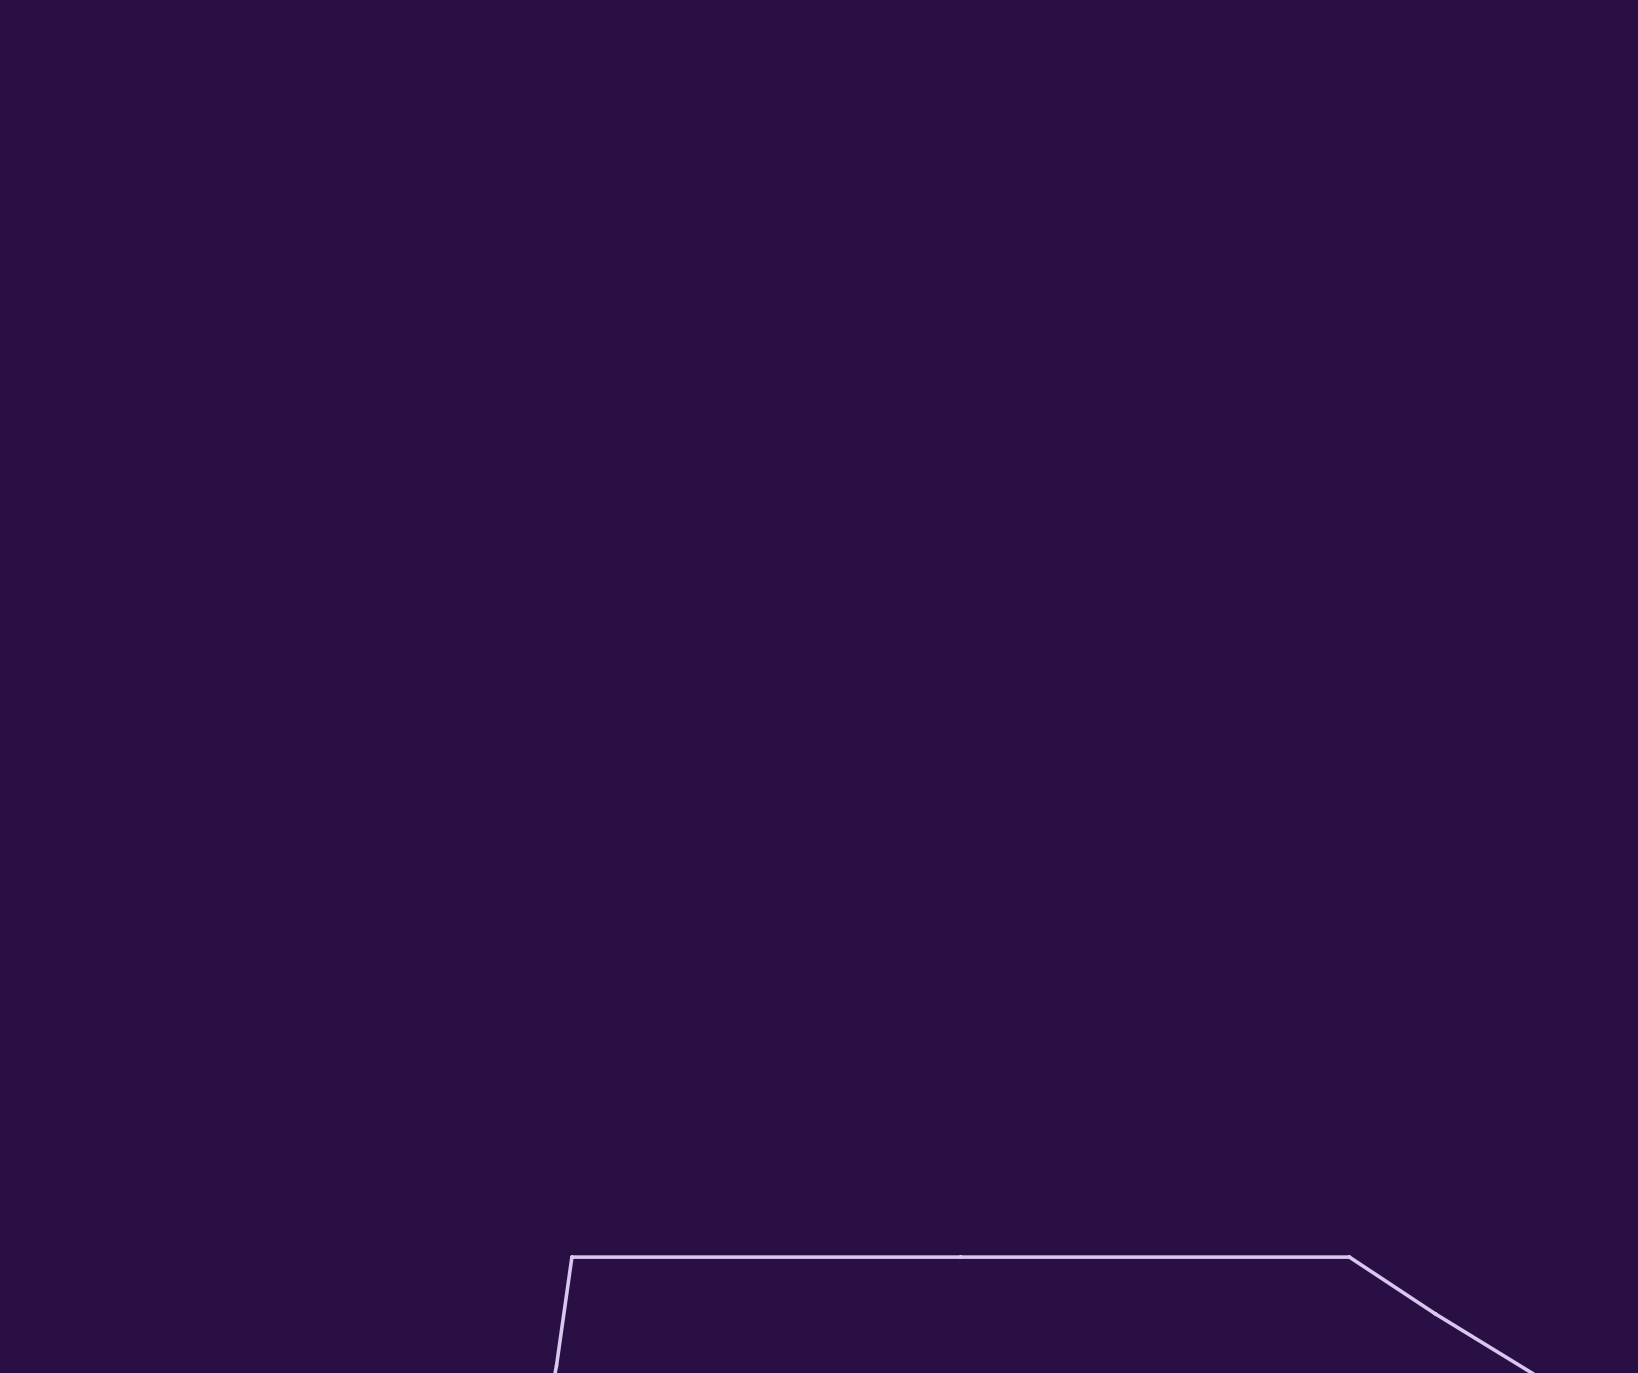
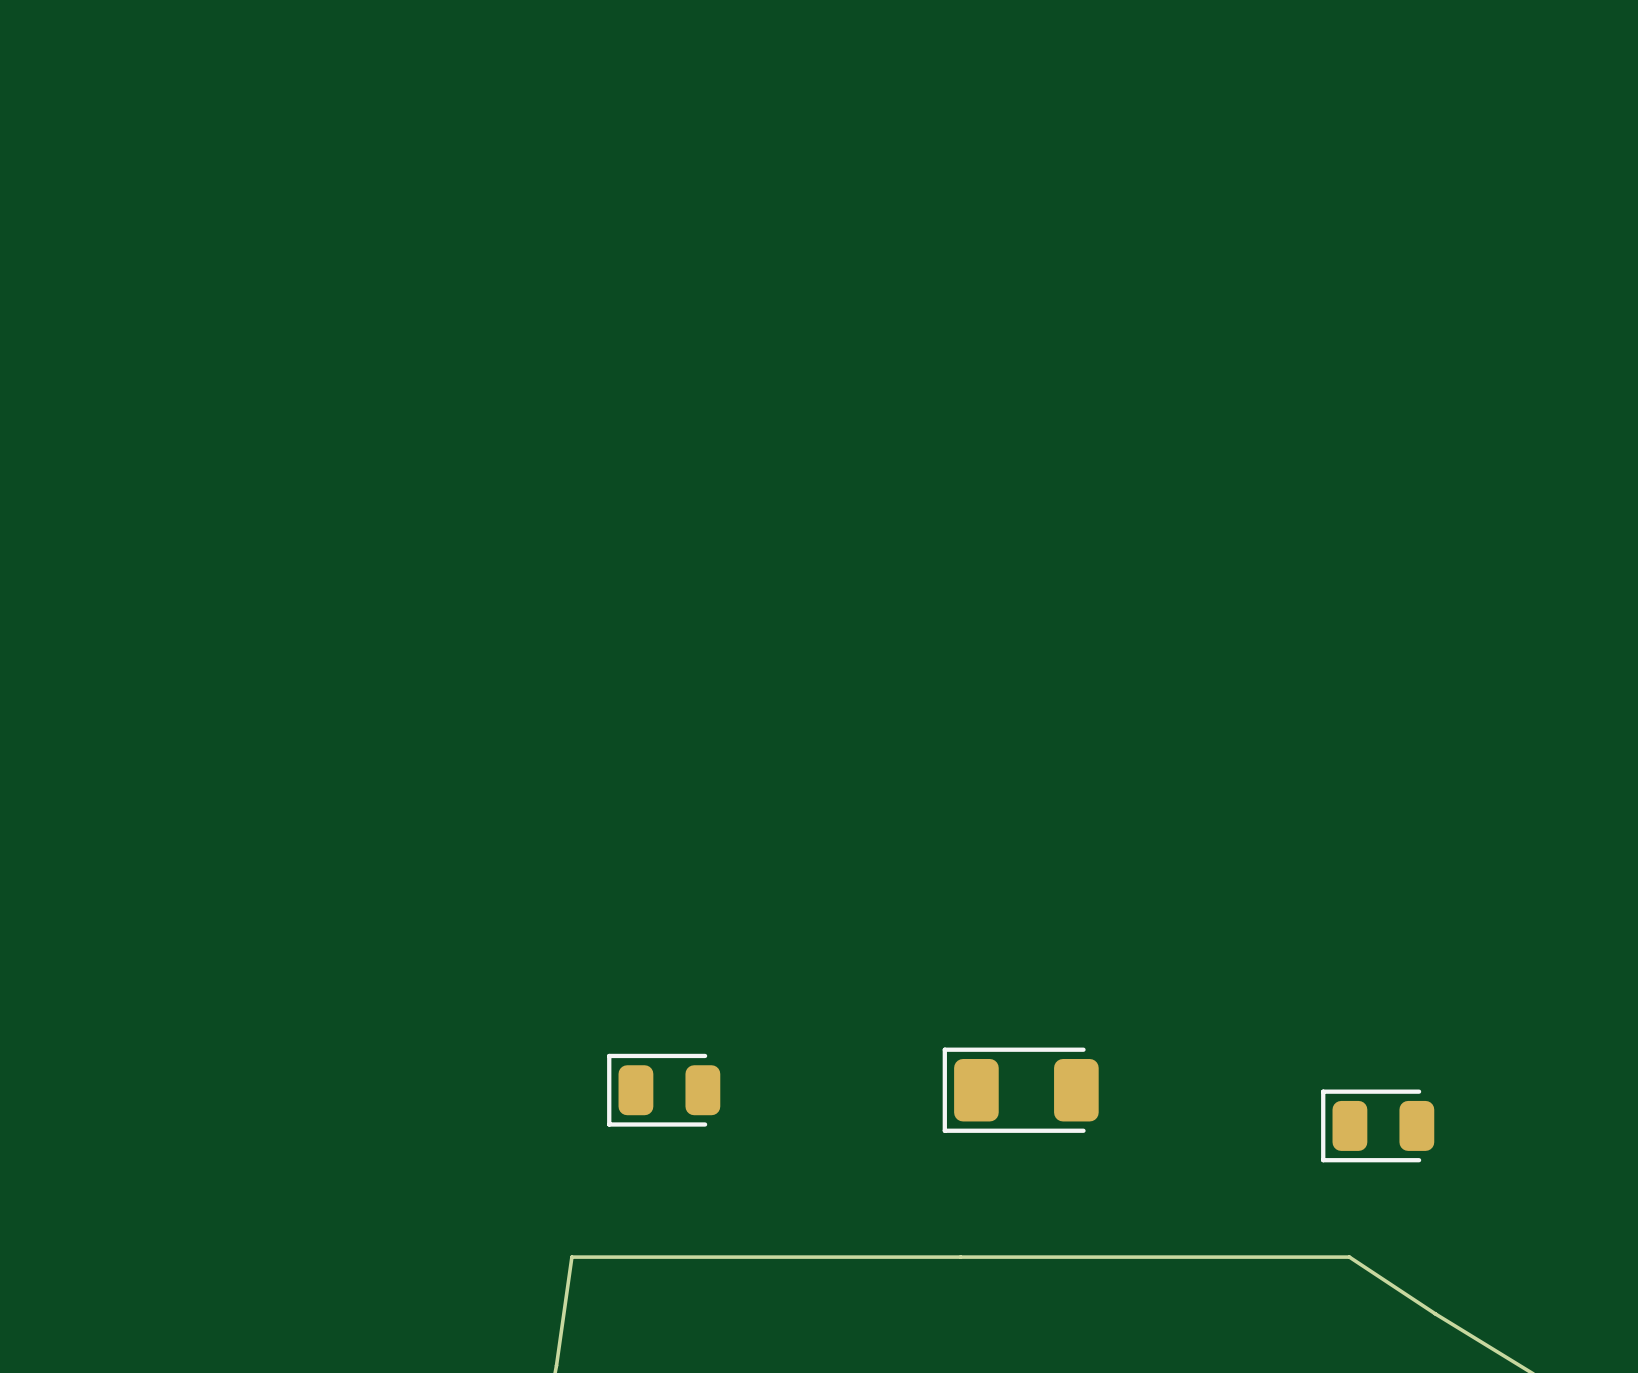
part: none -> (663, 1090)
part: none -> (1020, 1090)
part: none -> (1377, 1125)

